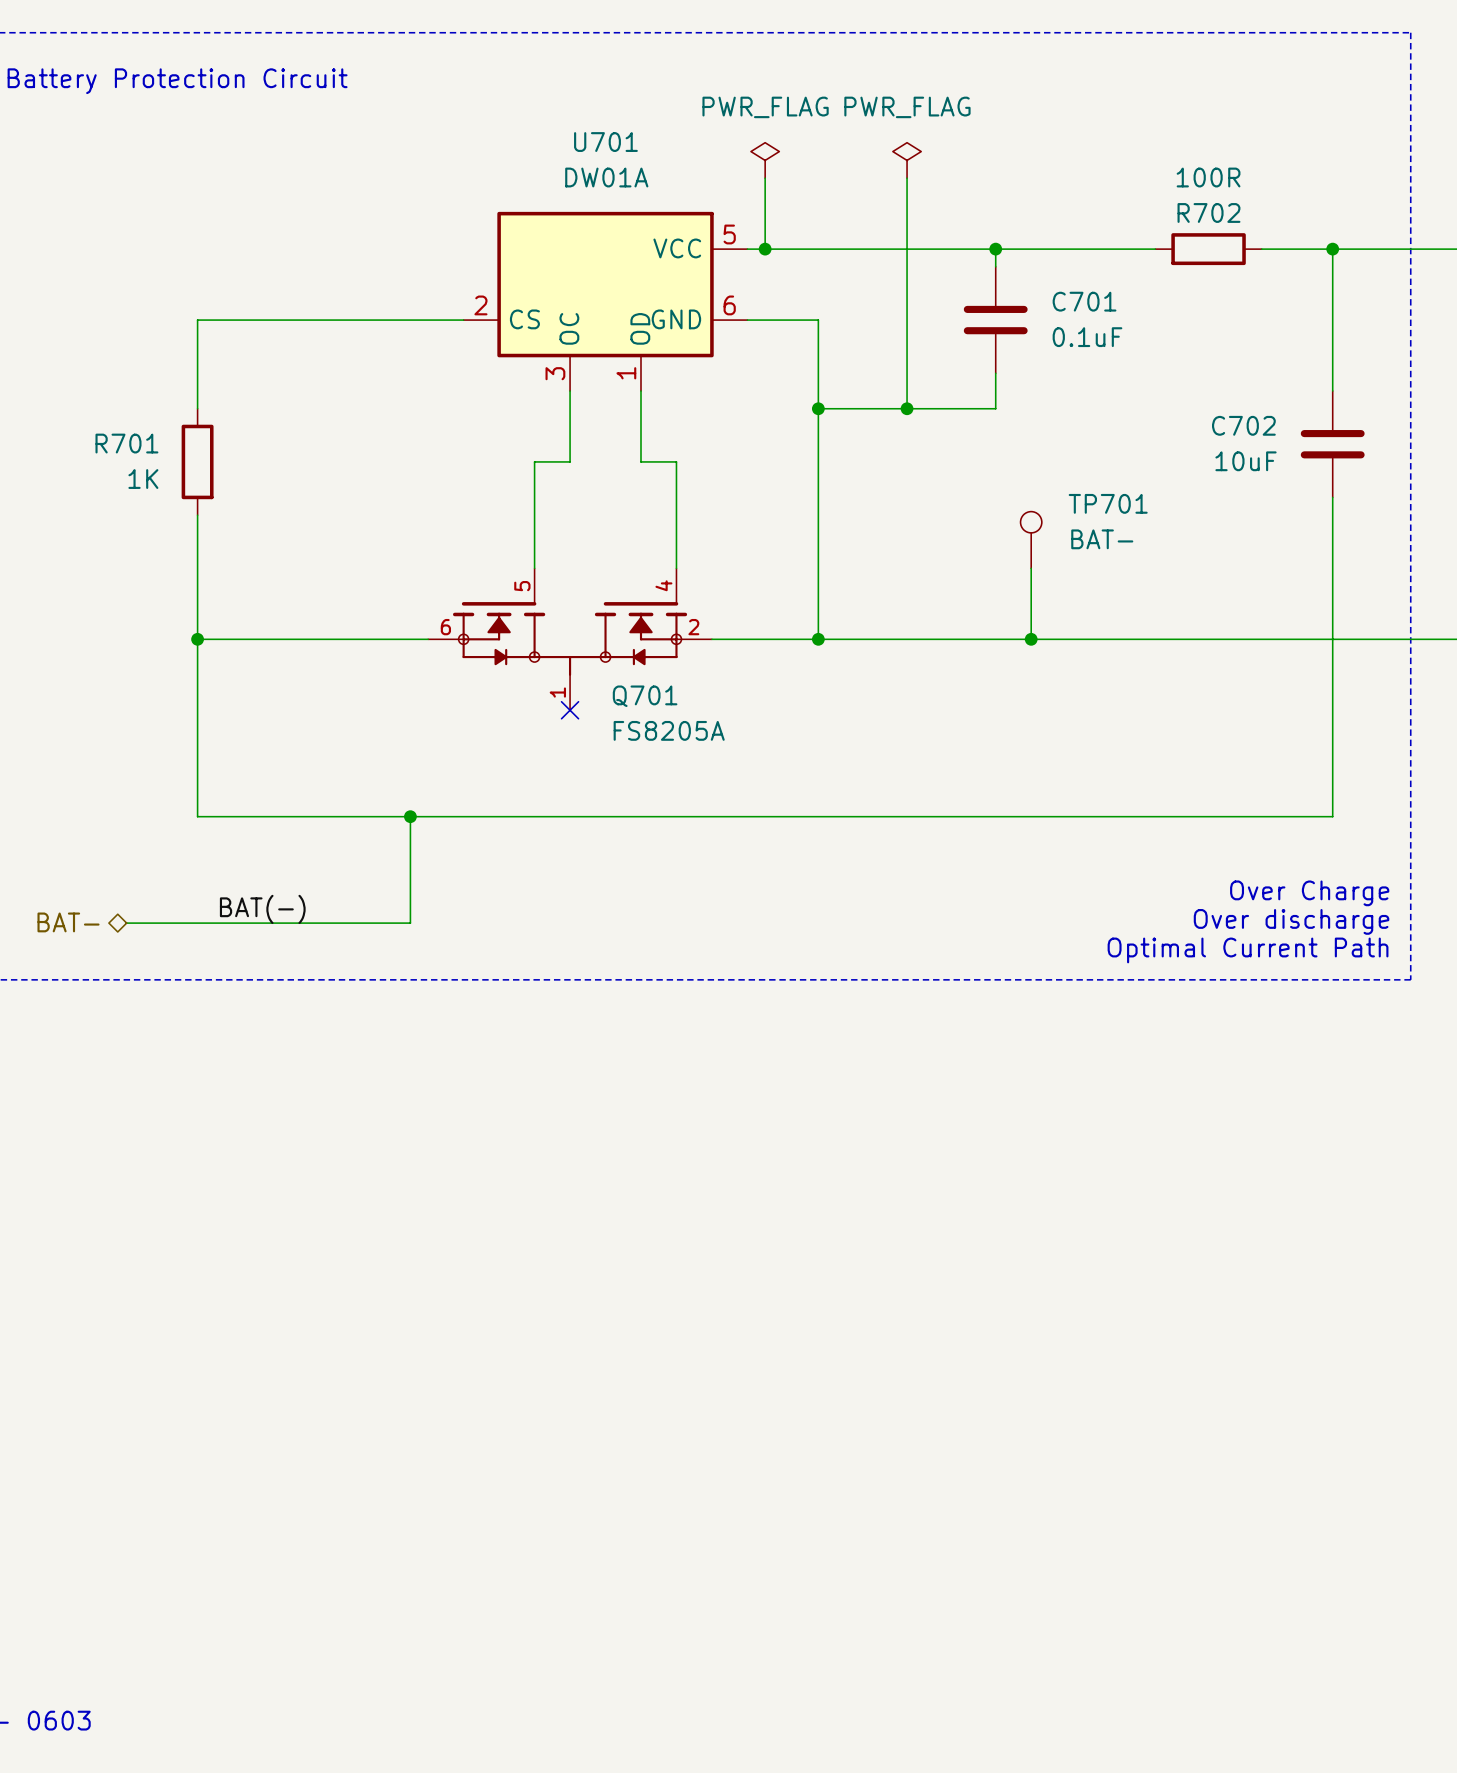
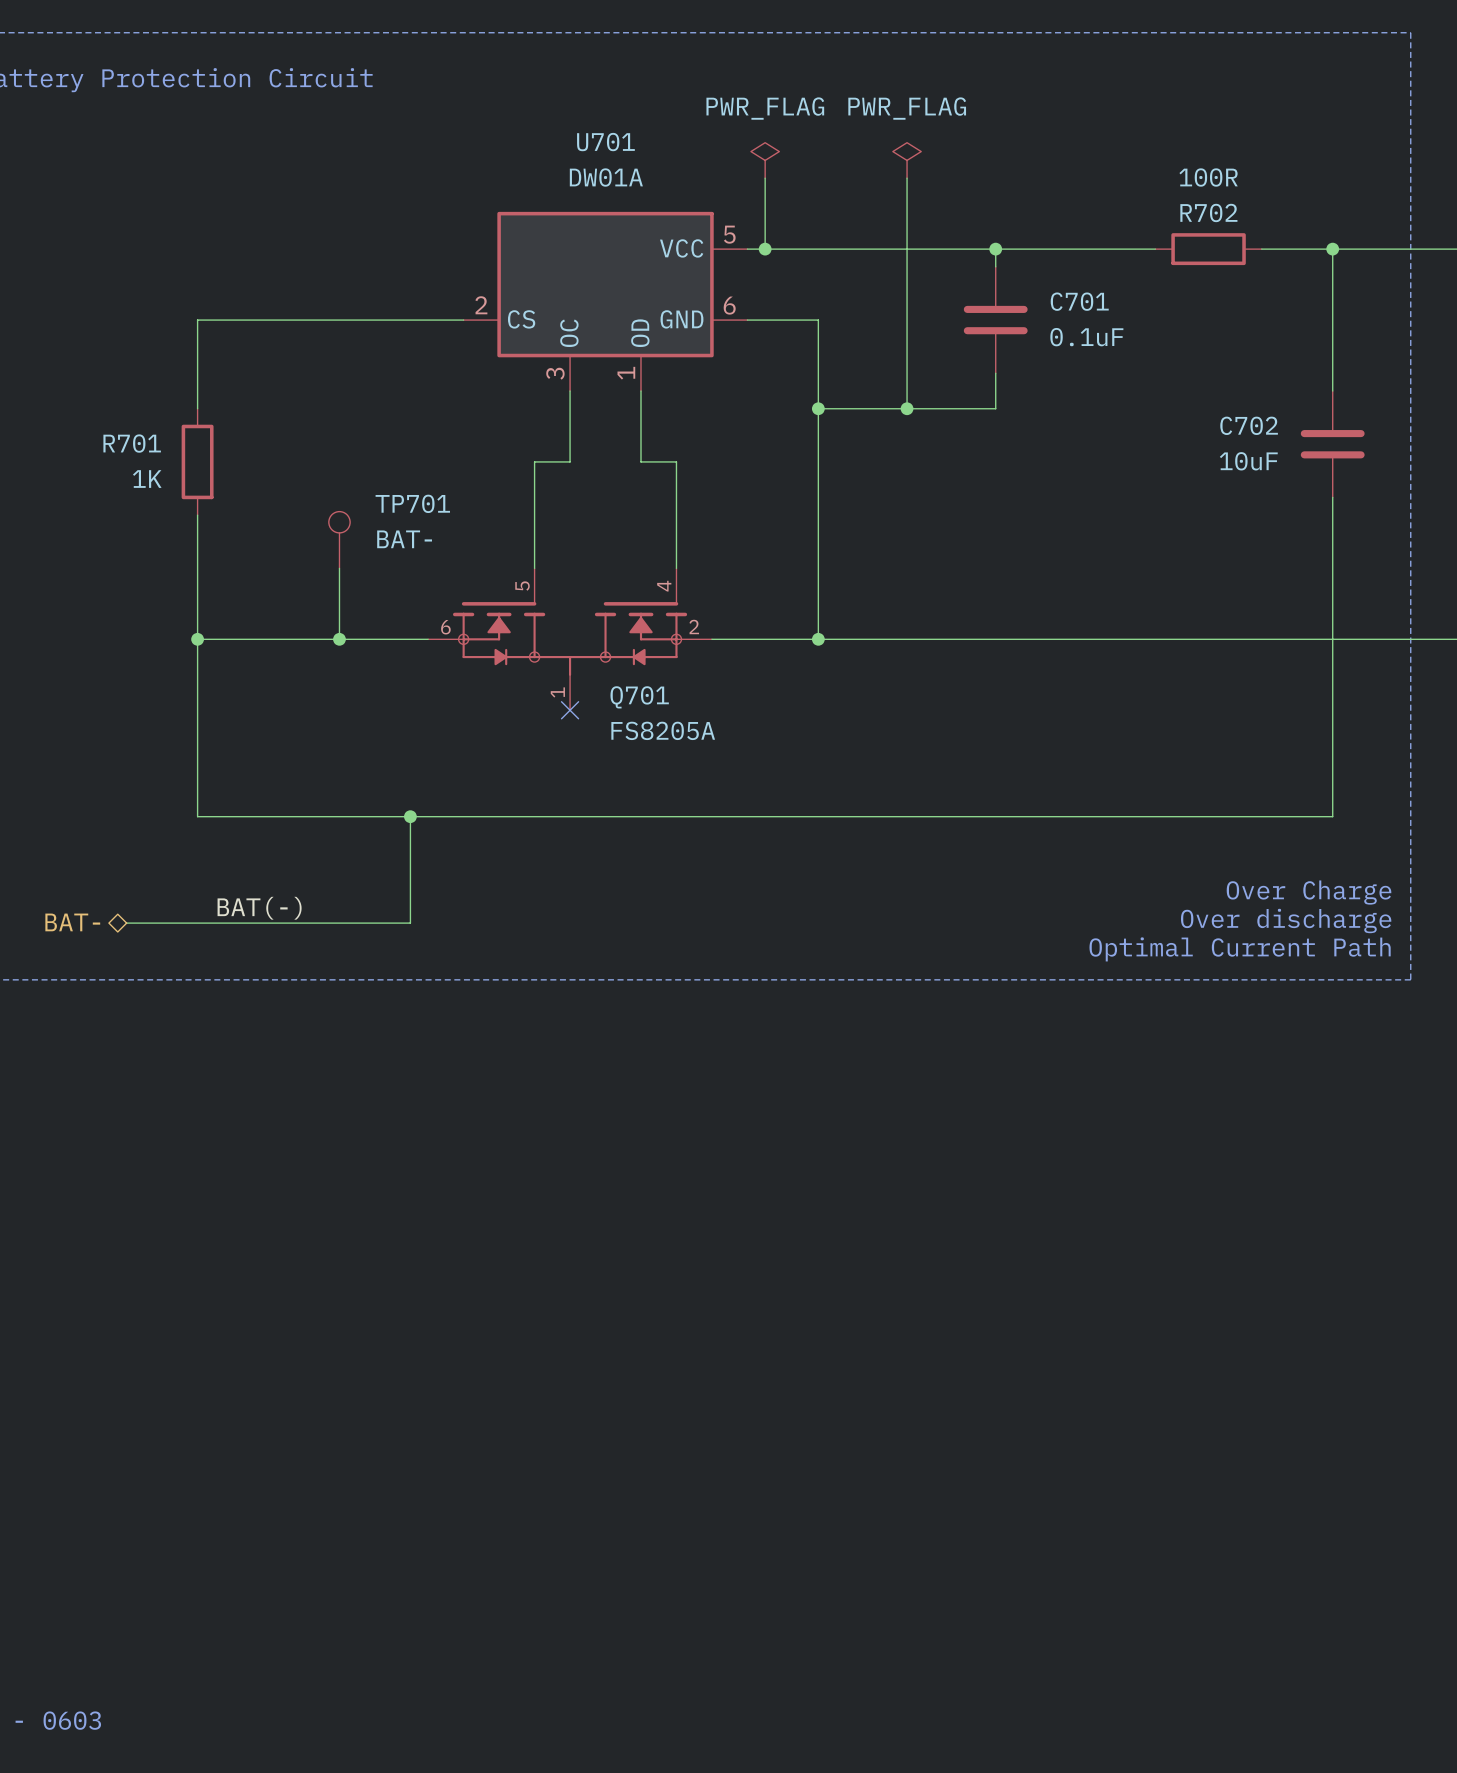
TP701 position: (1031, 539) -> (339, 539)
wire: none -> (339, 568) (339, 639)
wire: (1031, 568) (1031, 639) -> none
junction: none -> (339, 639)
junction: (1031, 639) -> none

